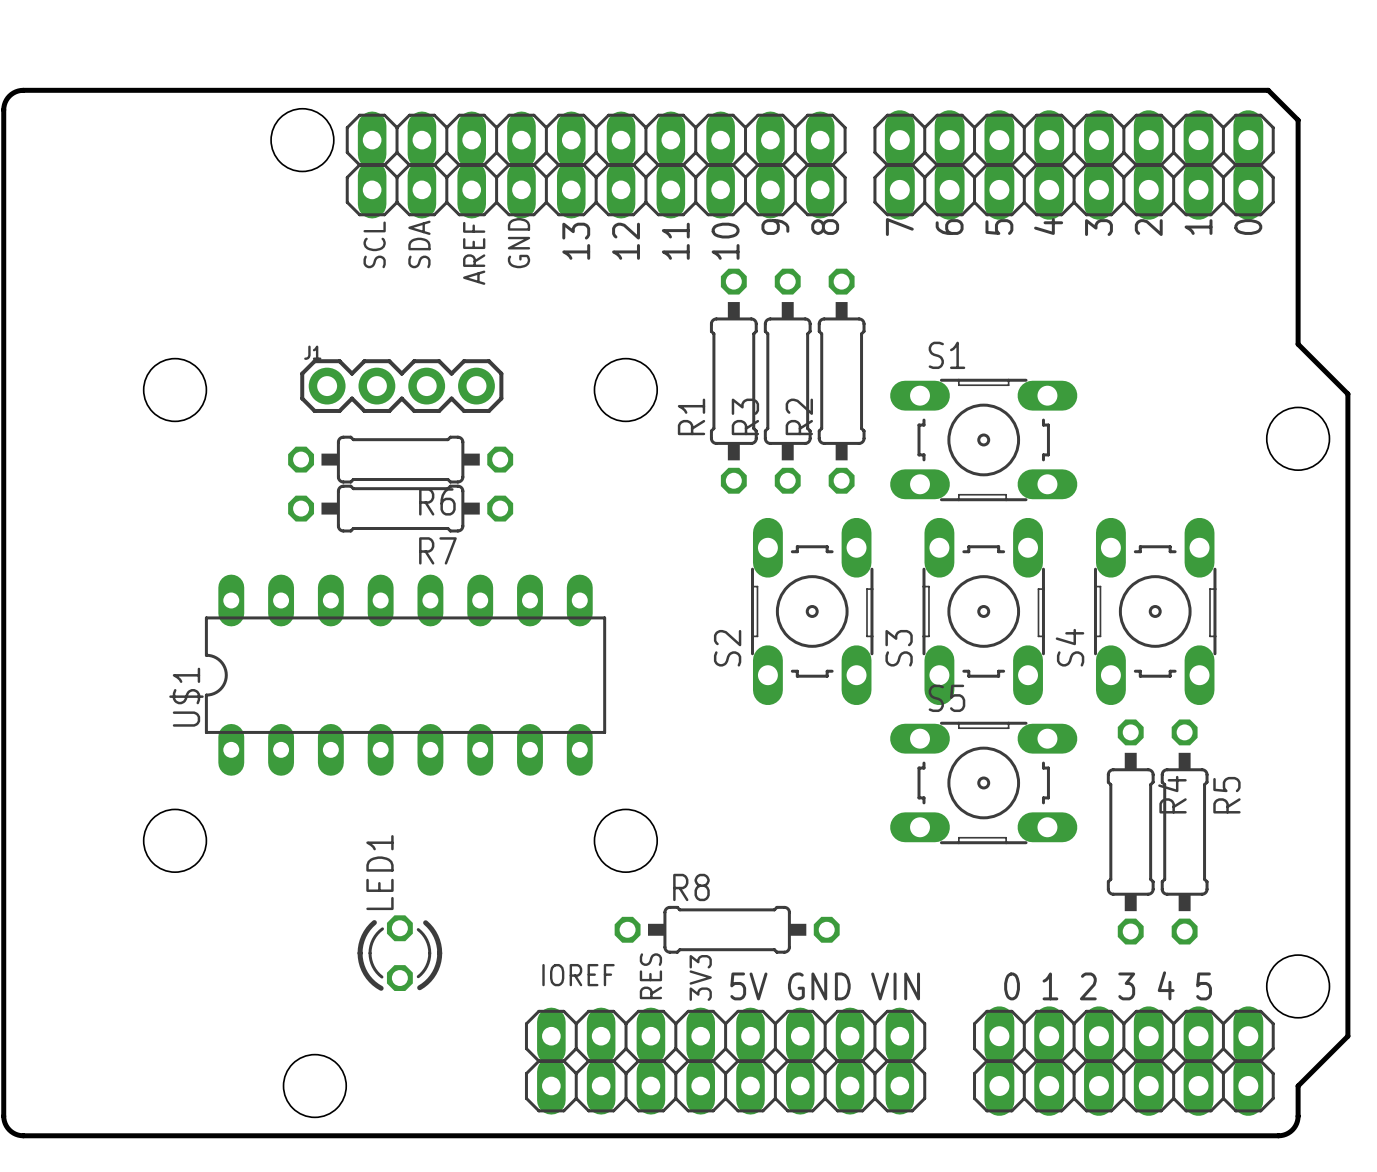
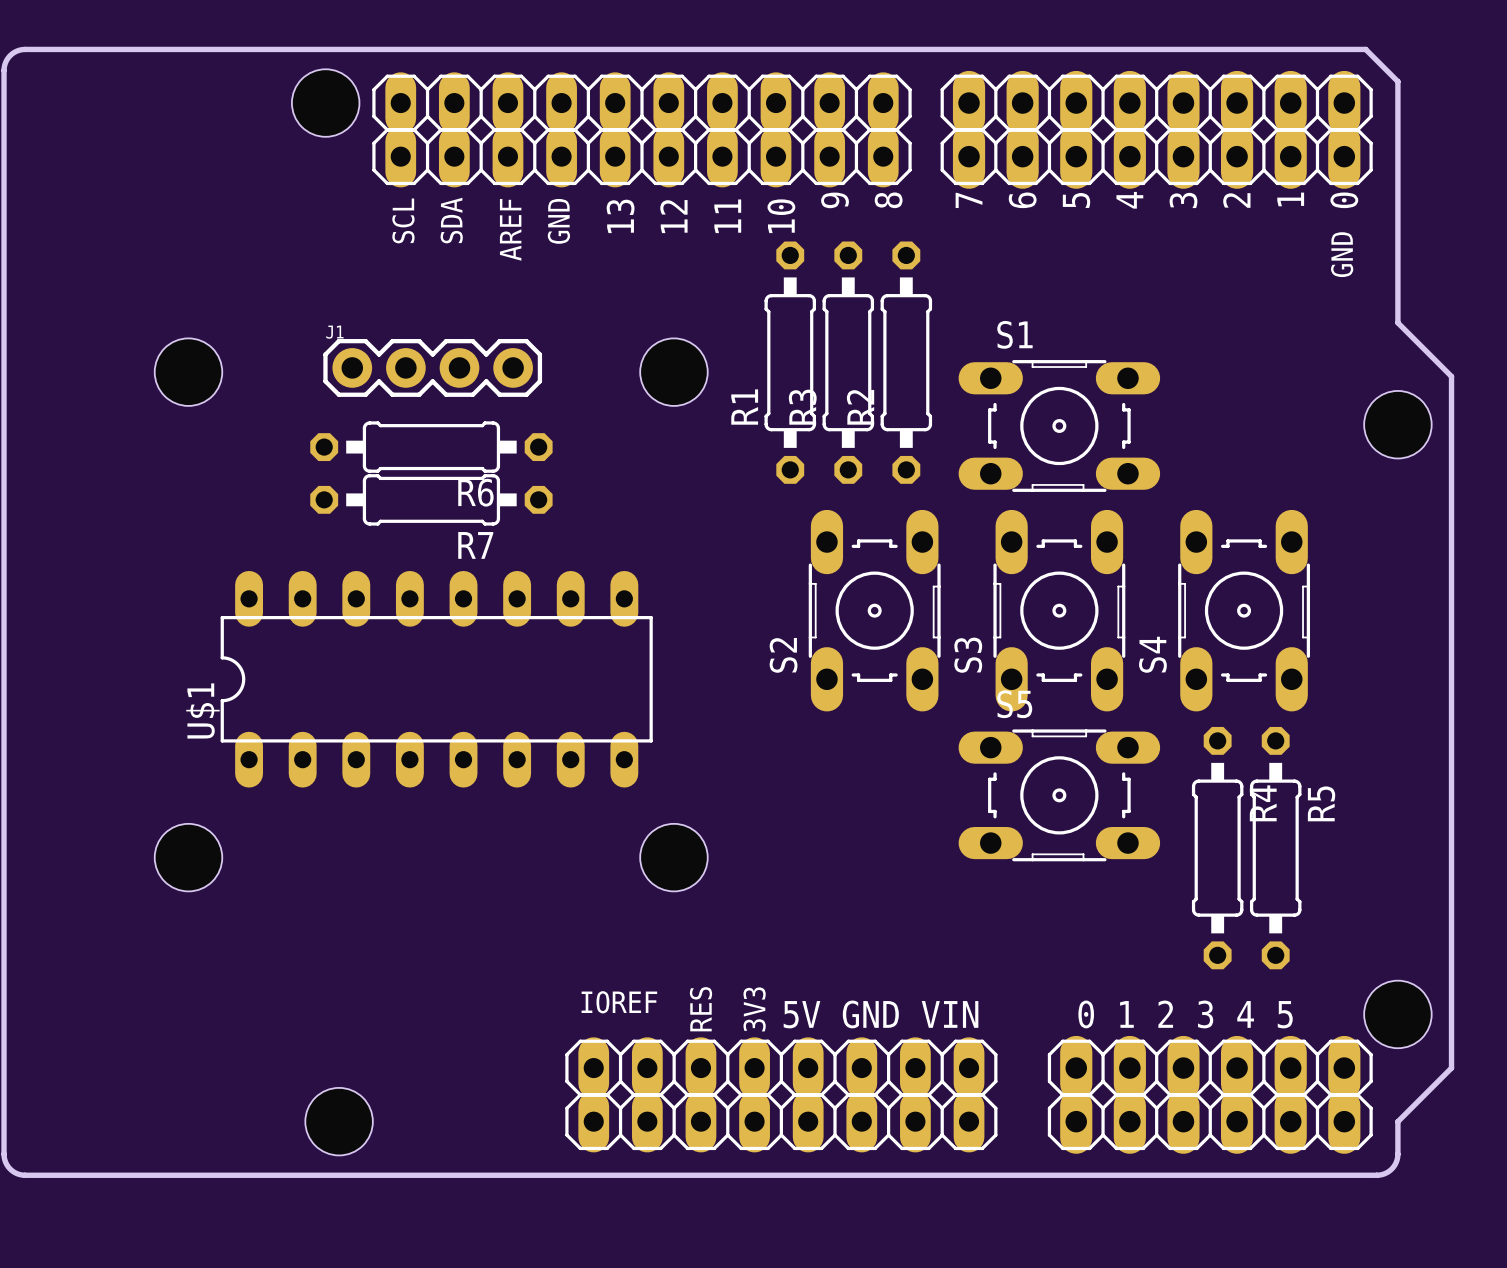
text: none -> GND (1342, 254)
R8: (727, 929) -> none
LED1: (399, 953) -> none

